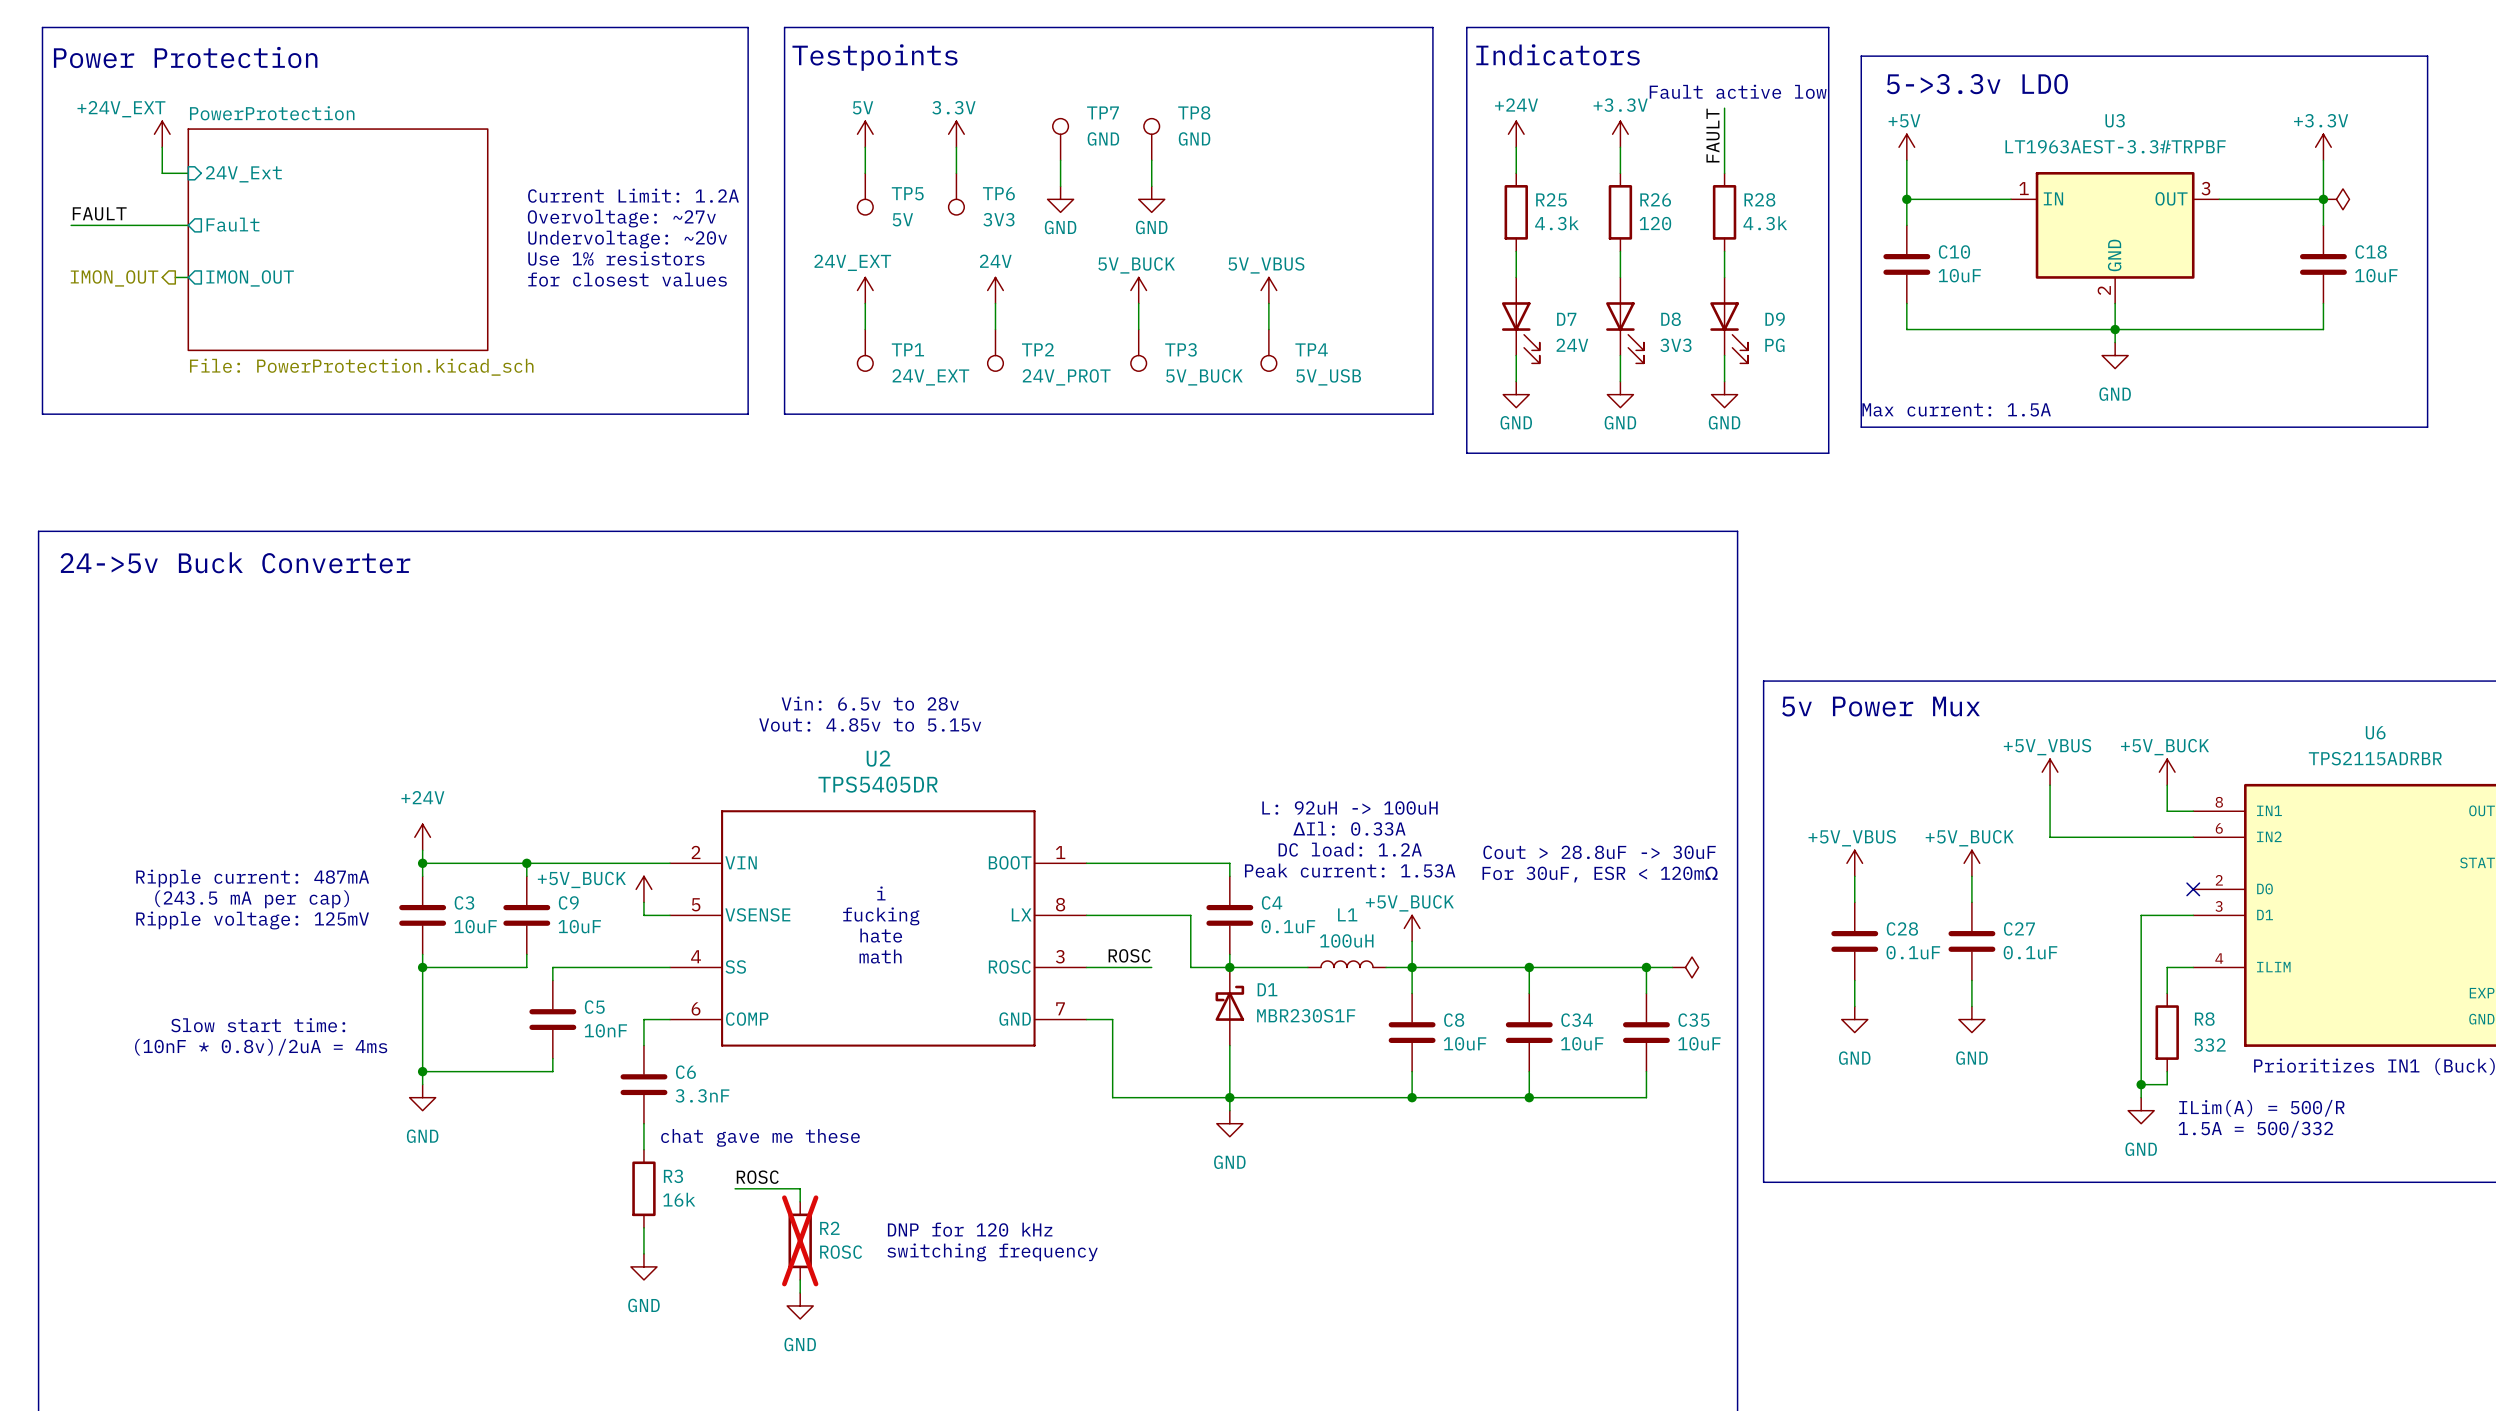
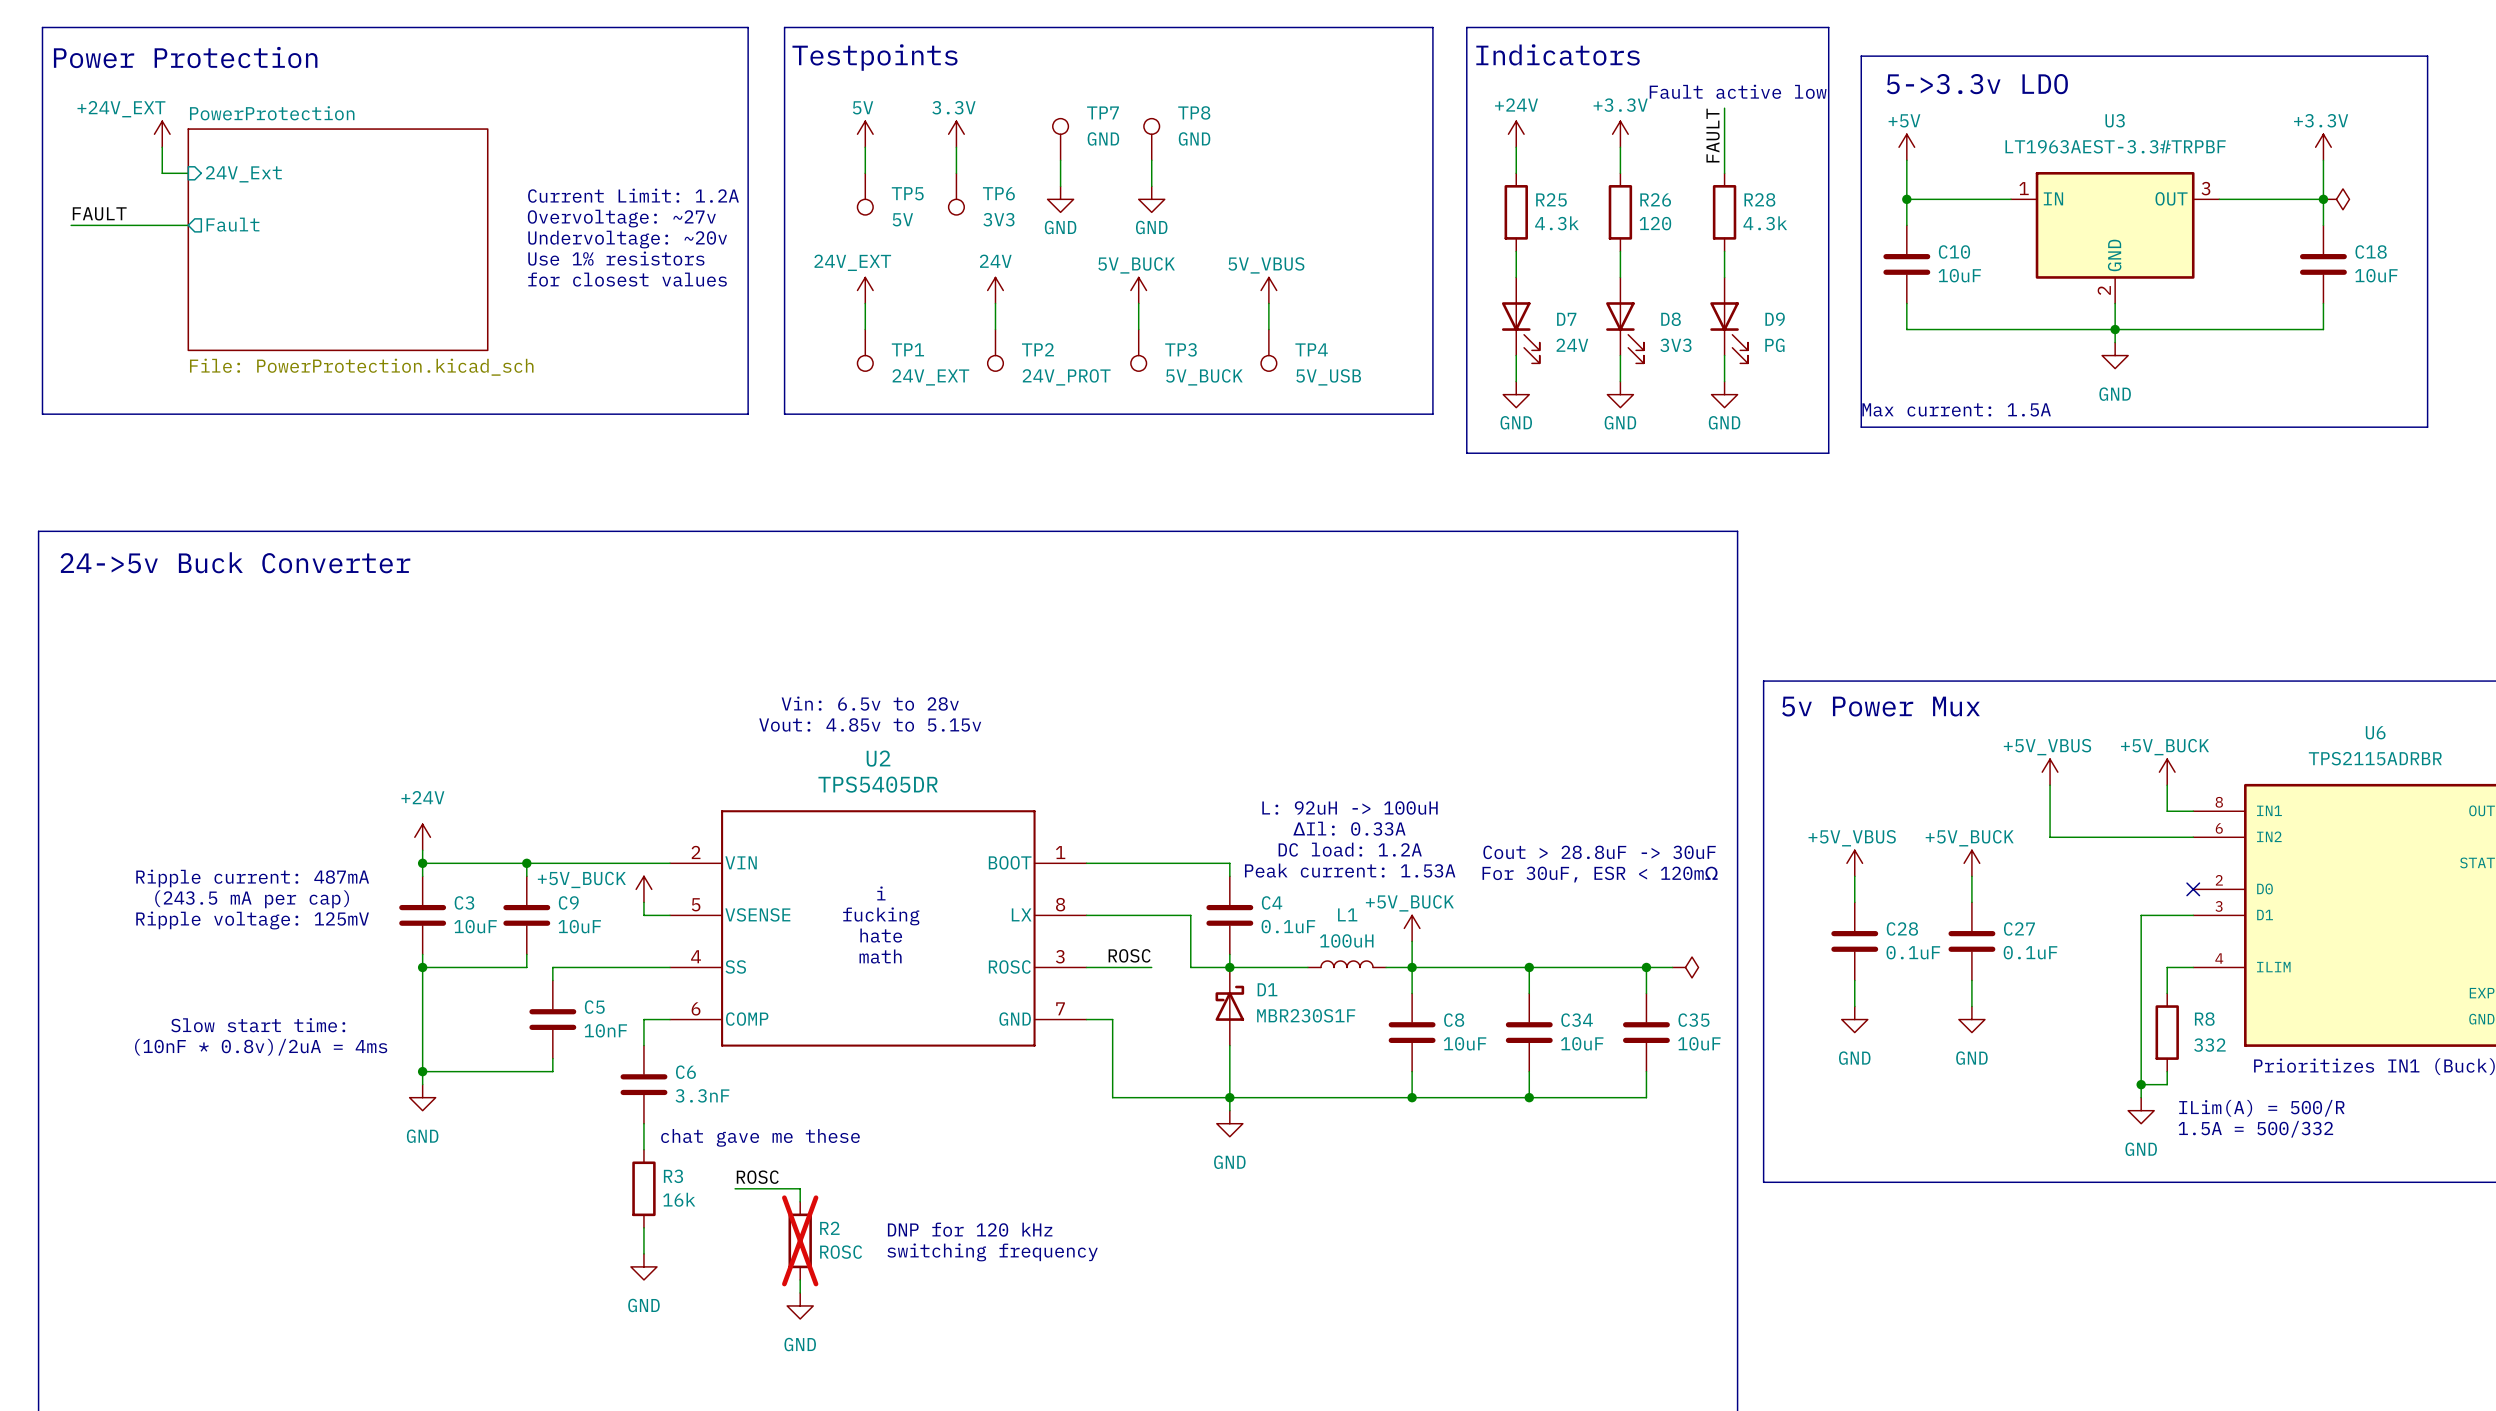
wire: (175, 277) (188, 277) -> none
hierarchical label: IMON_OUT (114, 278) -> none
sheet pin: IMON_OUT (250, 278) -> none

